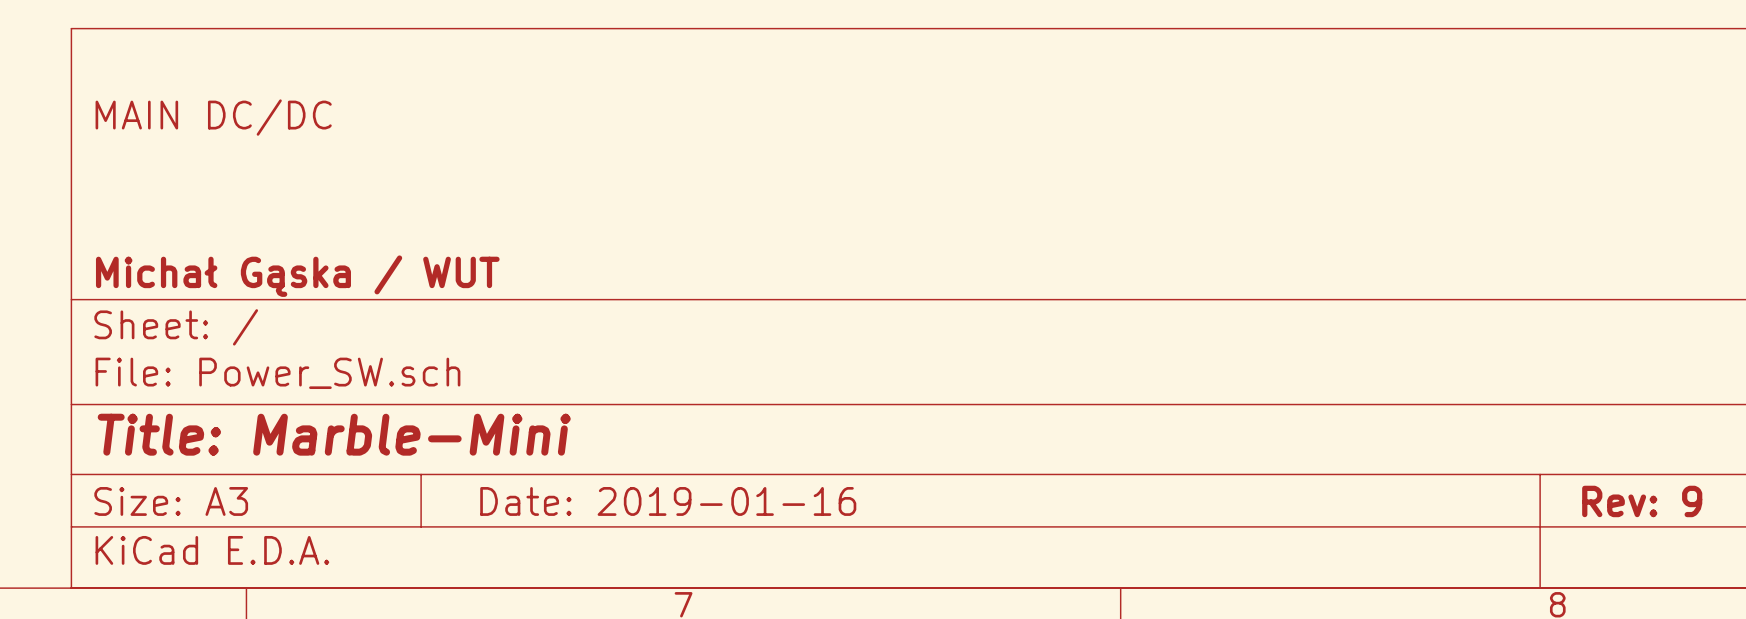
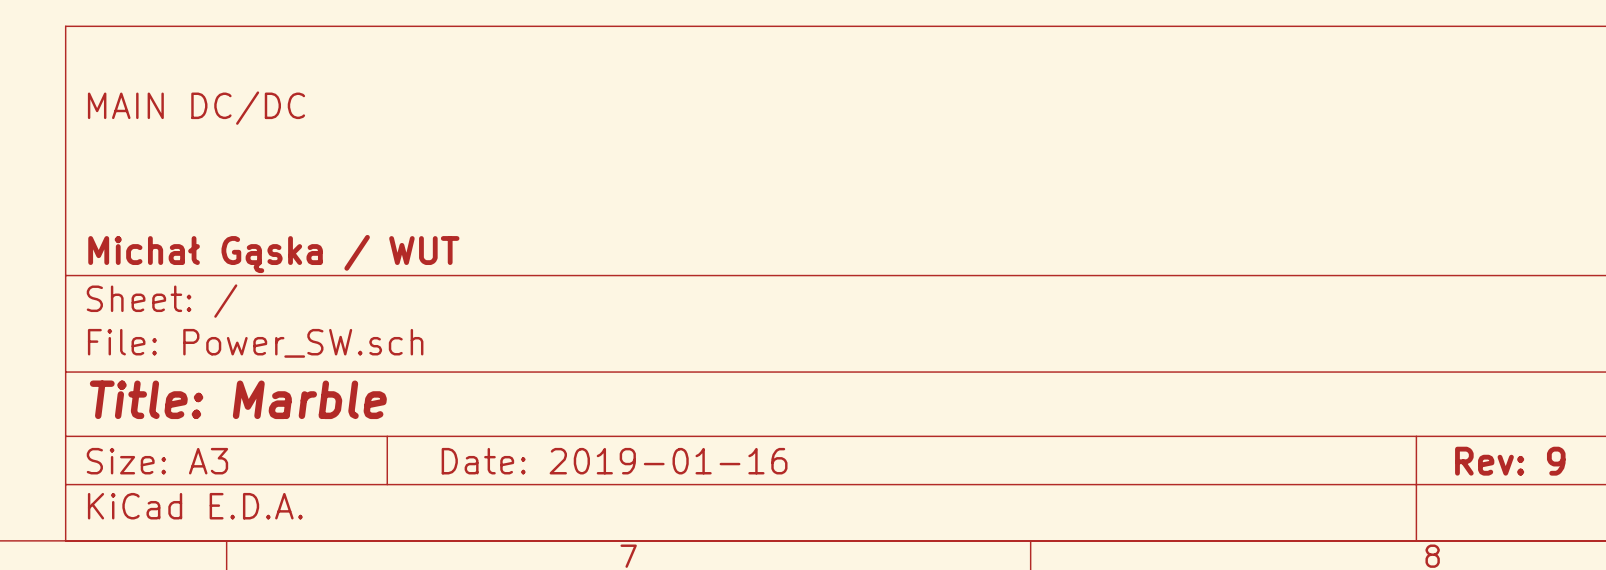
title block: Title: Marble-Mini (334, 434) -> Title: Marble (238, 399)

